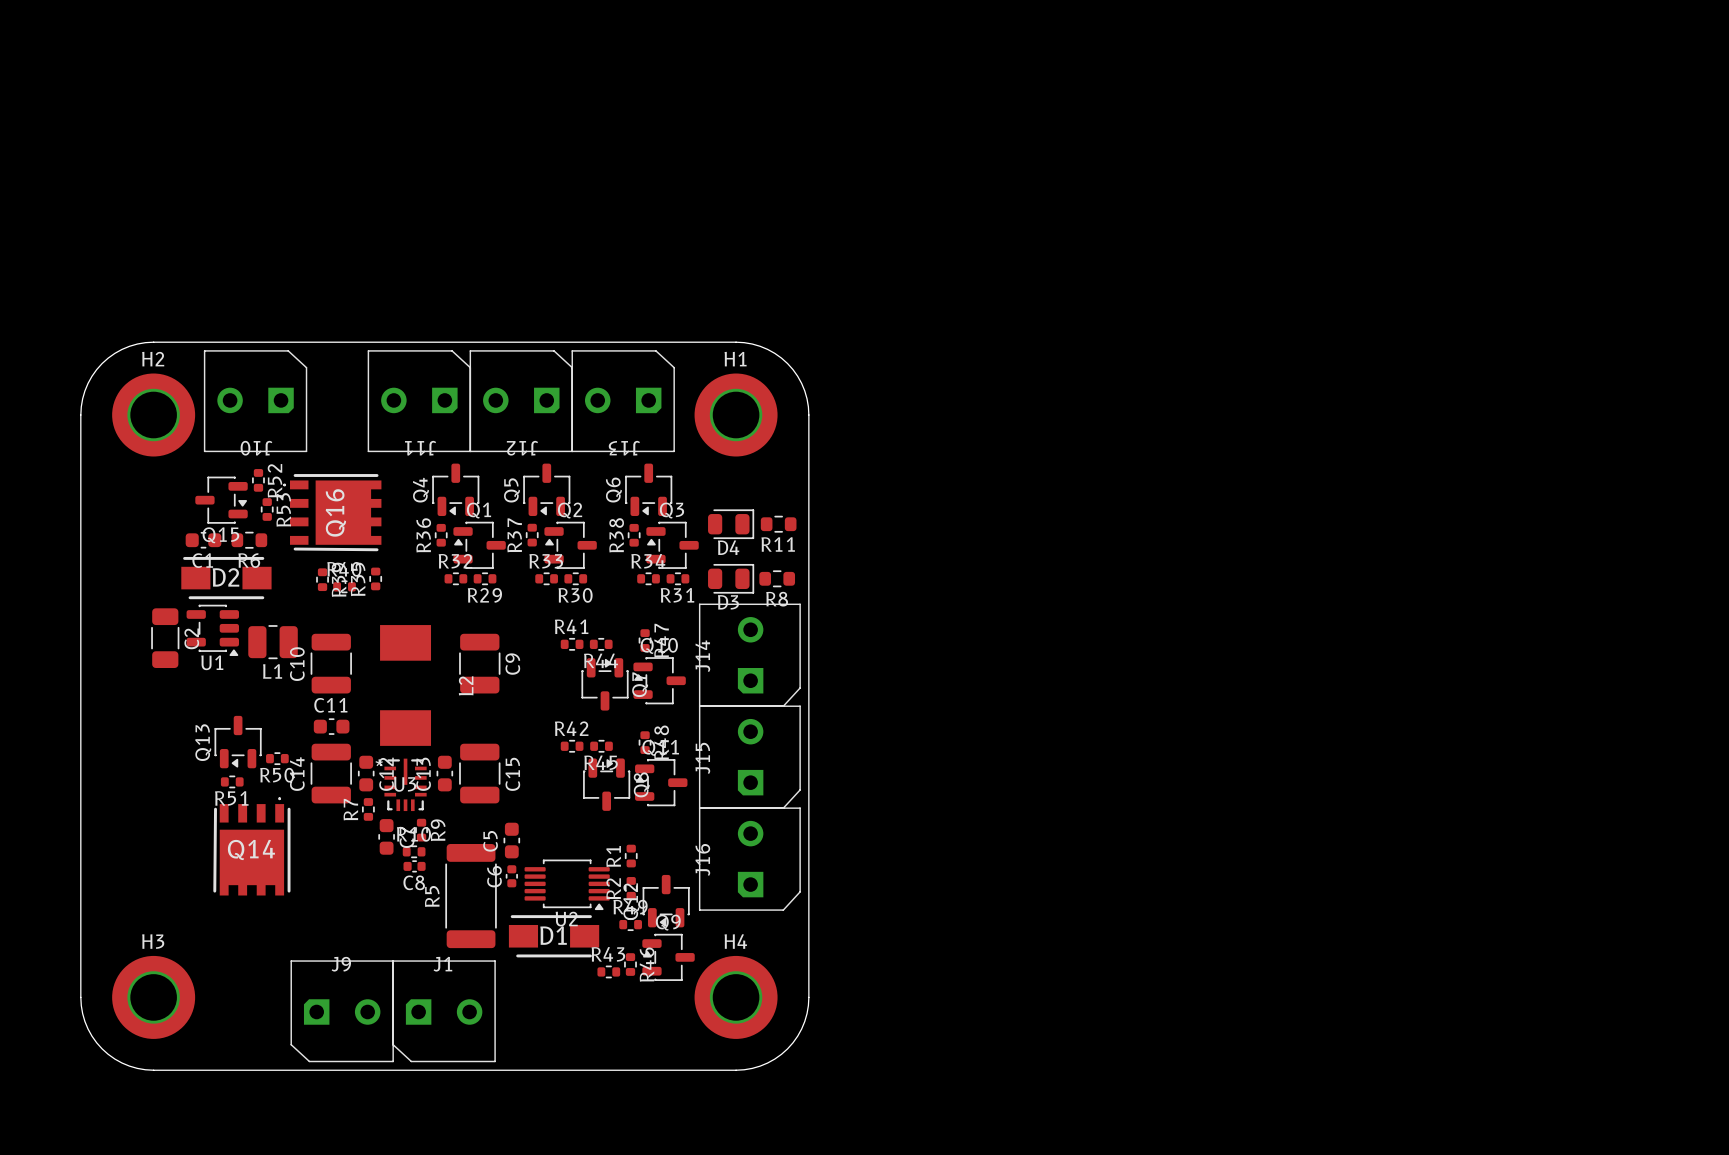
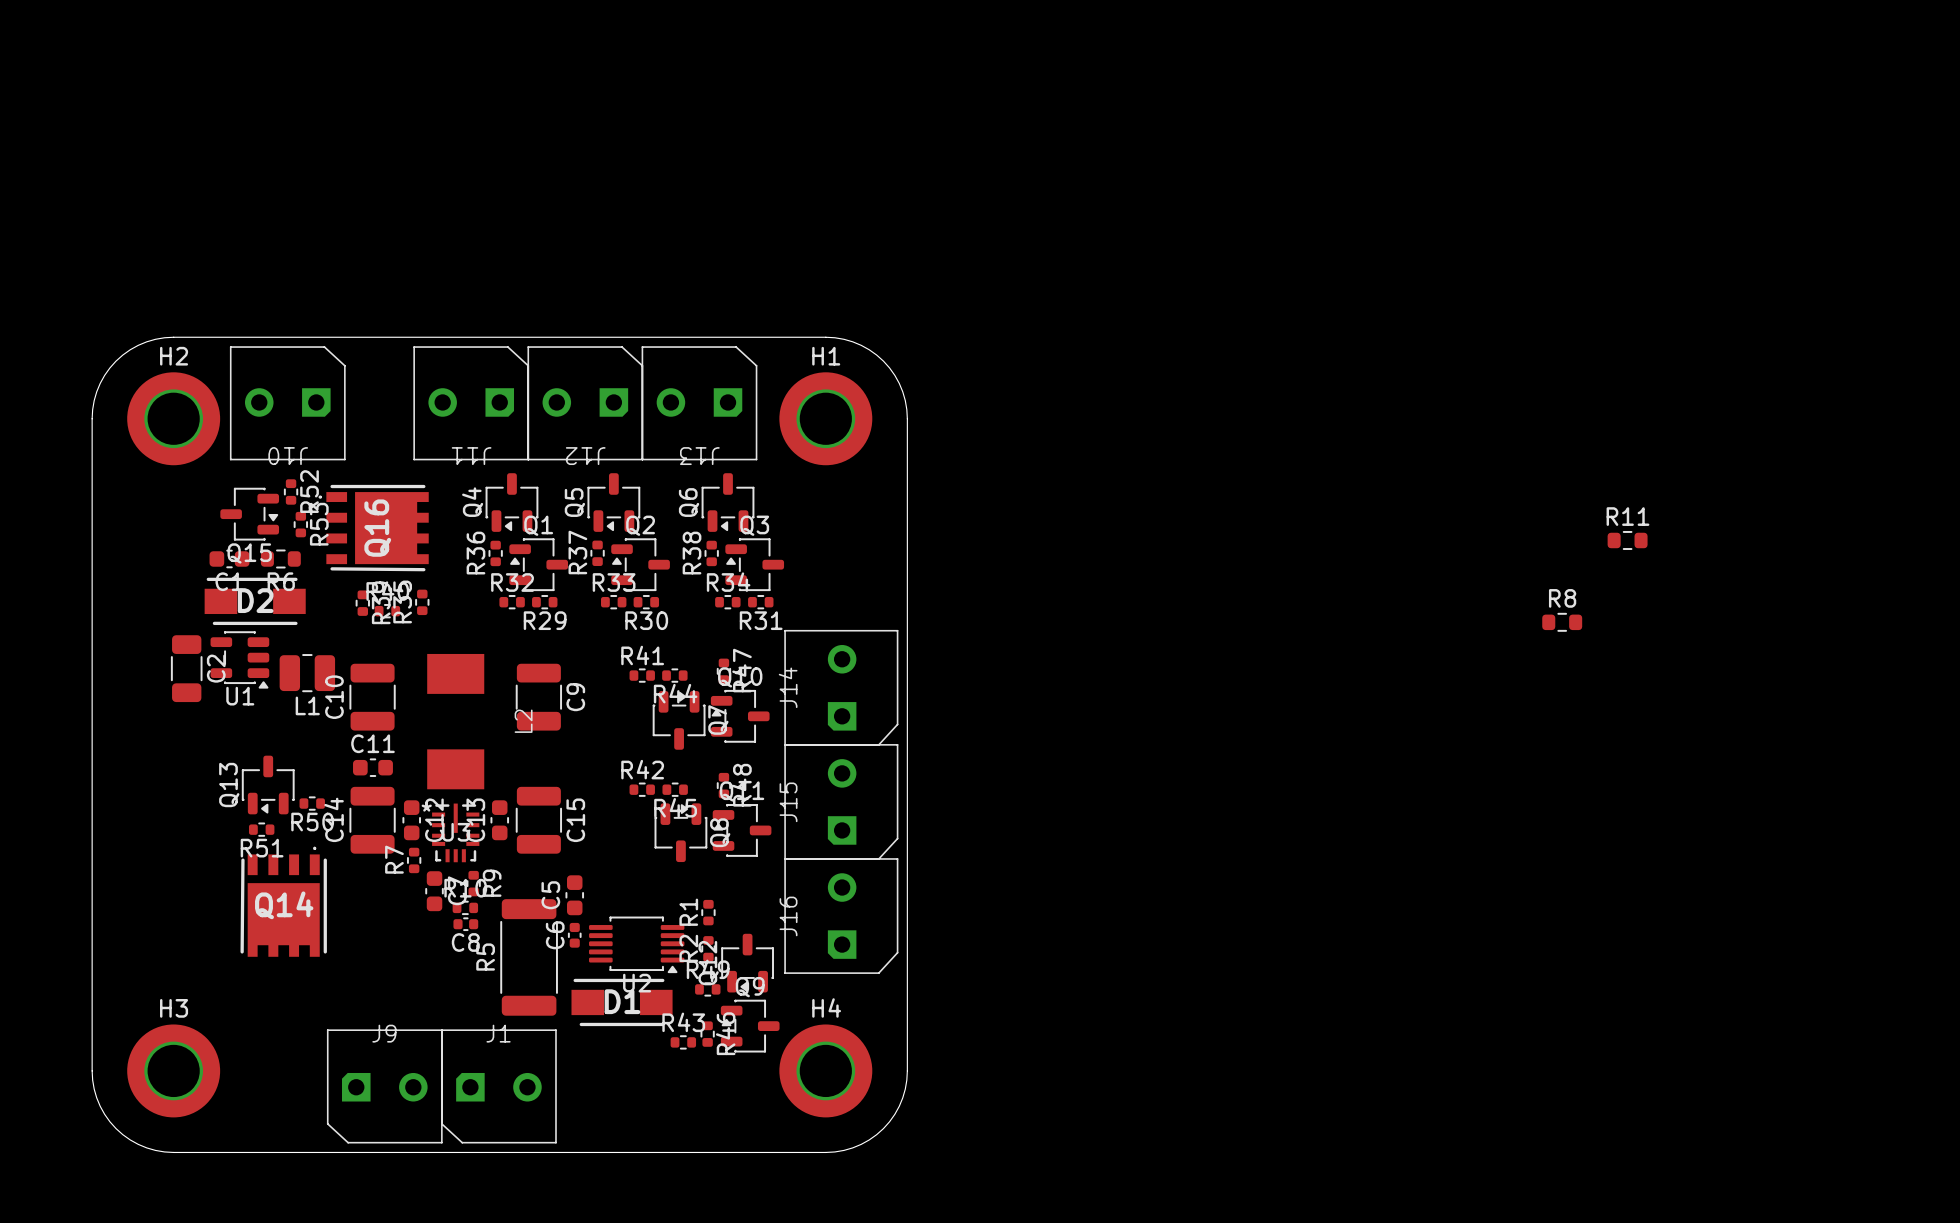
D4: (731, 524) -> none
R11 position: (778, 524) -> (1627, 540)
R11 name position: R11 (778, 544) -> R11 (1627, 516)
D3: (731, 578) -> none
R8 position: (777, 578) -> (1562, 622)
R8 name position: R8 (777, 599) -> R8 (1562, 598)

